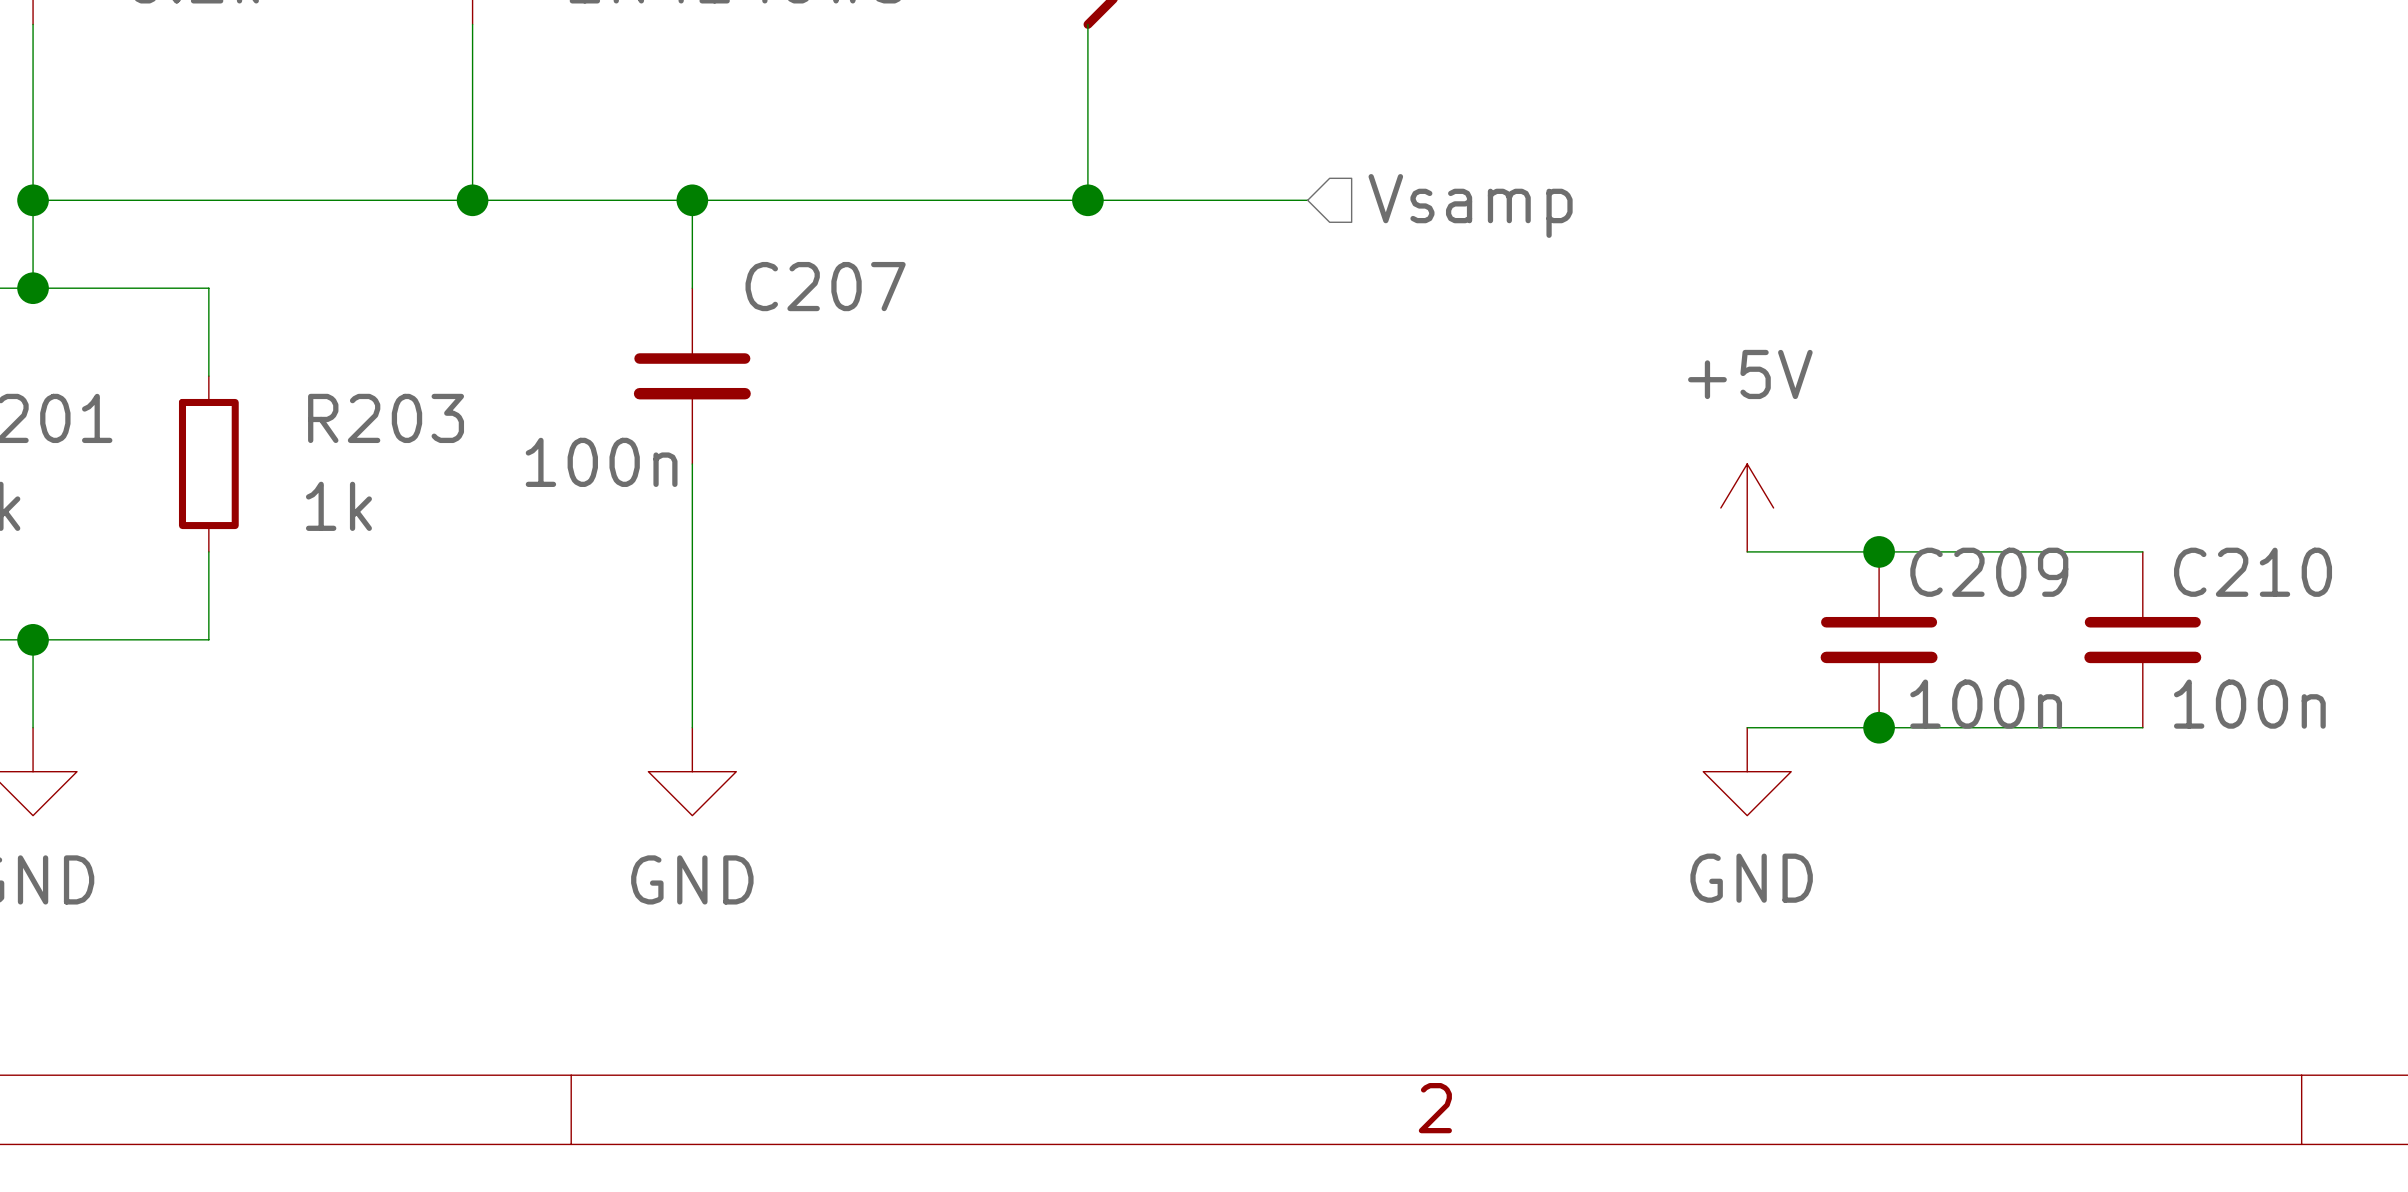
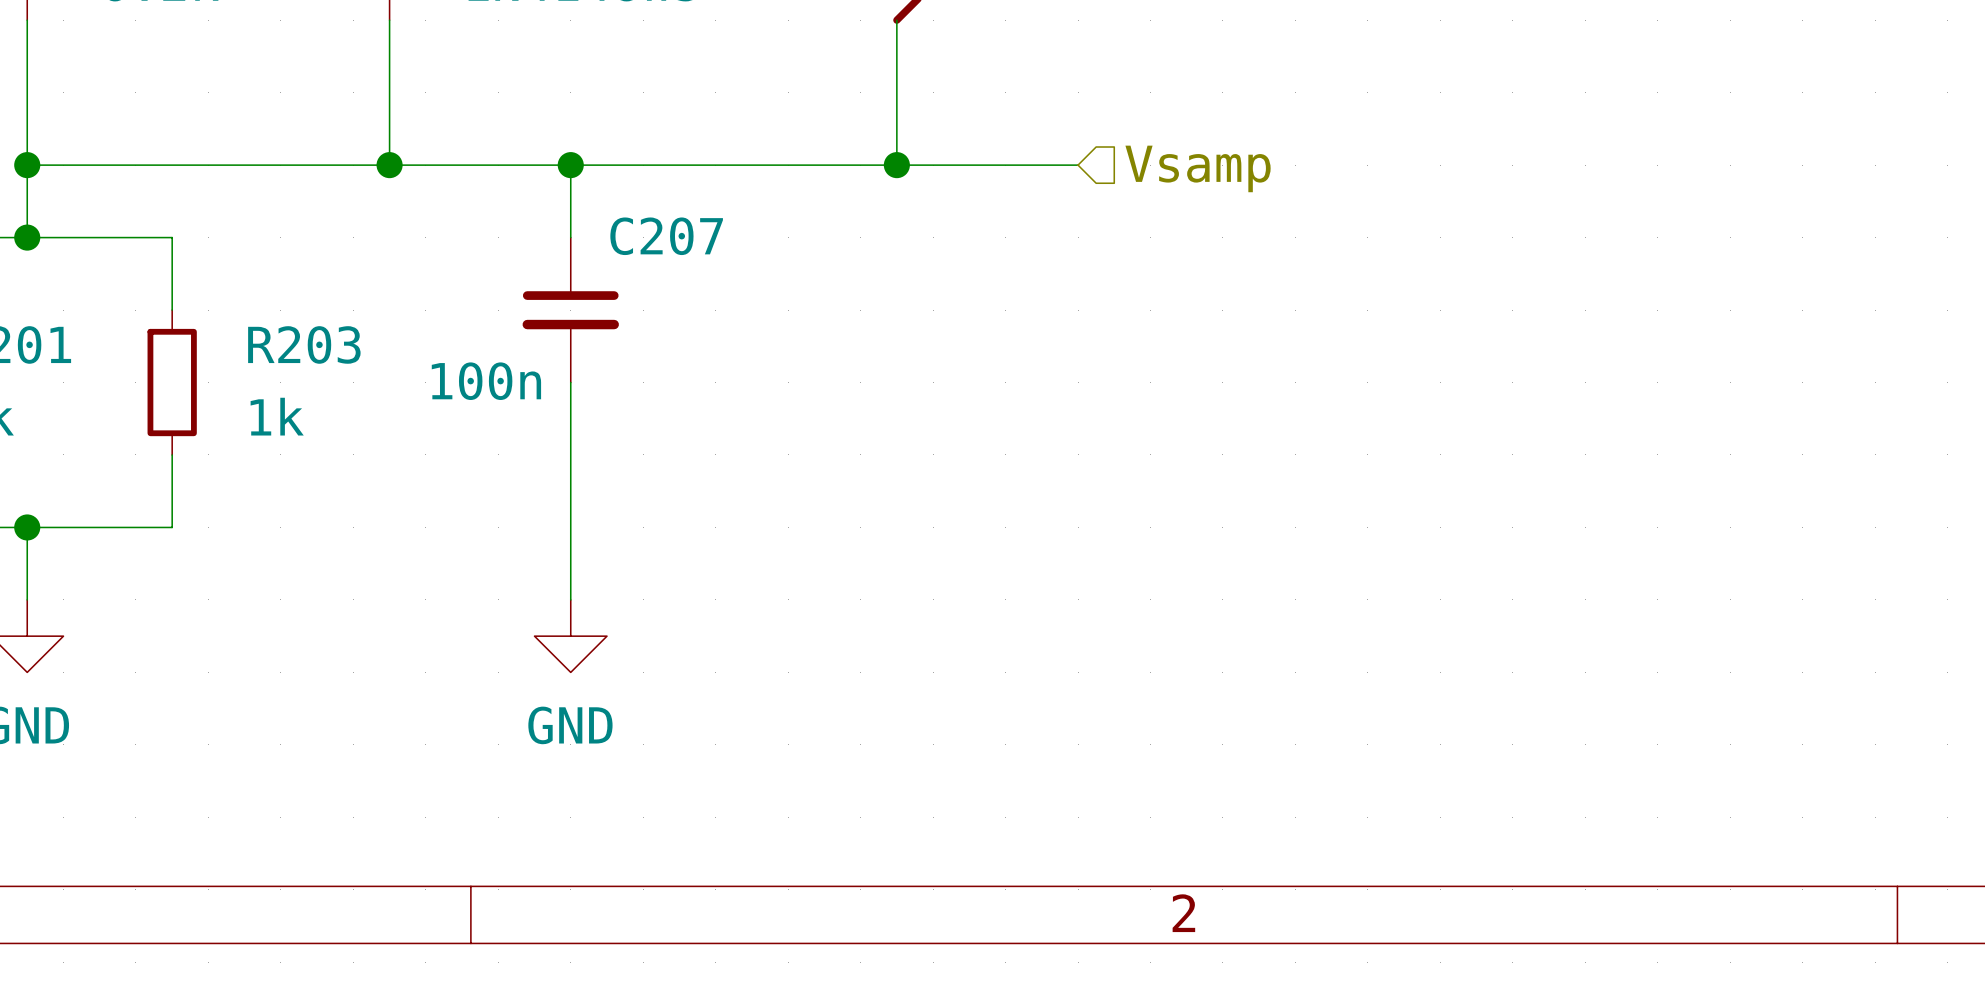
power symbol: +5V (1747, 507) -> none
wire: (1747, 551) (2142, 551) -> none
junction: (1879, 551) -> none
C209: 100n (1879, 639) -> none
C210: 100n (2142, 639) -> none
wire: (1747, 727) (2142, 727) -> none
junction: (1879, 727) -> none
power symbol: GND (1747, 771) -> none

